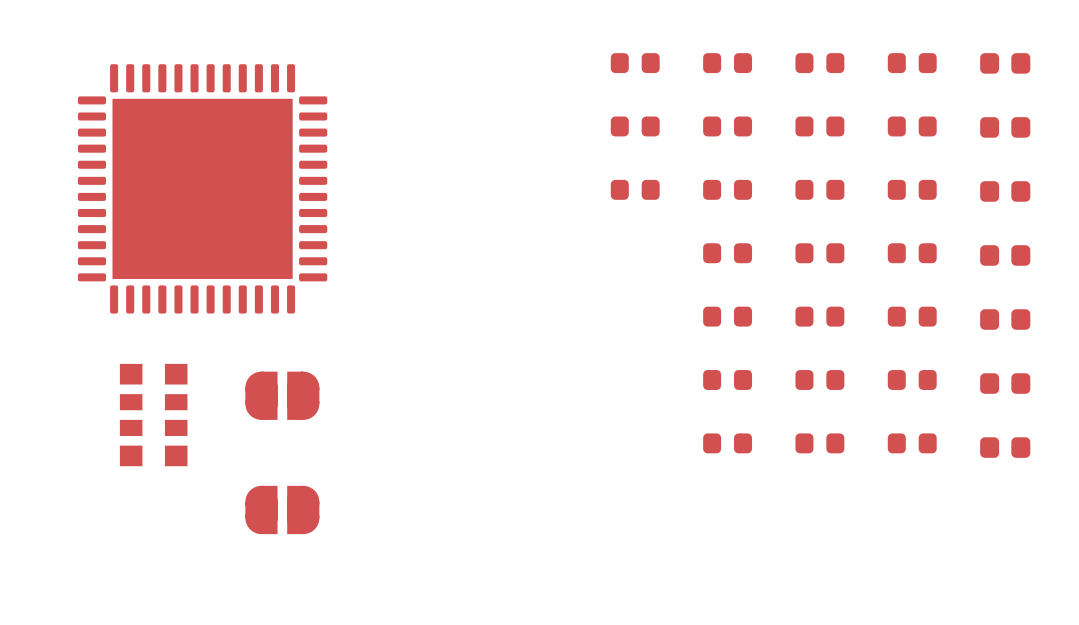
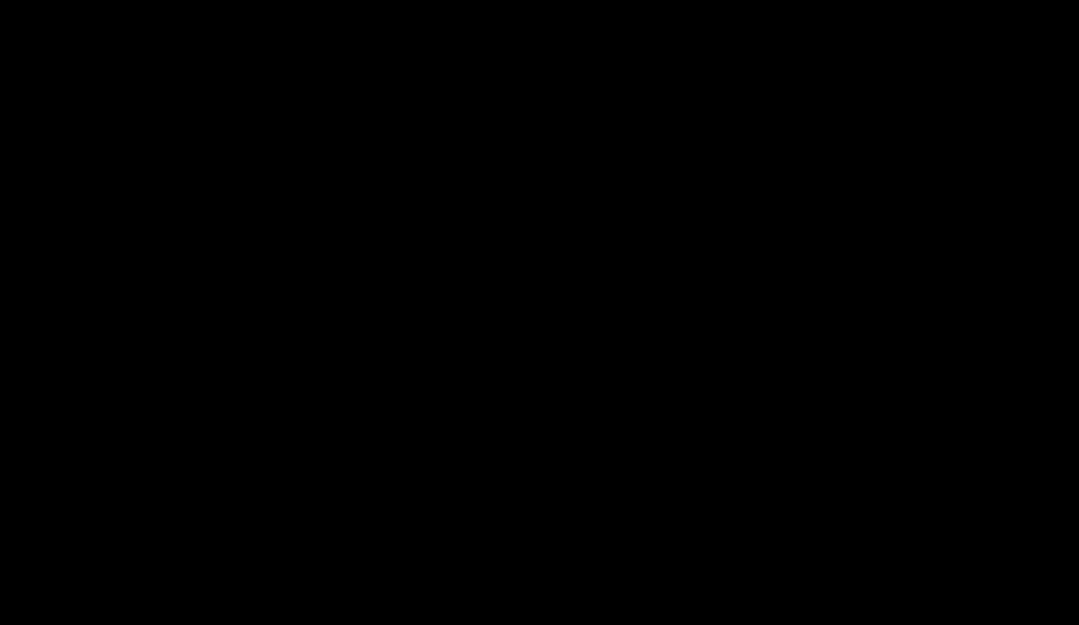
part: (635, 63) -> none
part: (727, 63) -> none
part: (819, 63) -> none
part: (912, 63) -> none
part: (1005, 63) -> none
part: (635, 126) -> none
part: (727, 126) -> none
part: (819, 126) -> none
part: (912, 126) -> none
part: (1005, 127) -> none
part: (202, 188) -> none
part: (635, 189) -> none
part: (727, 189) -> none
part: (819, 189) -> none
part: (912, 189) -> none
part: (1005, 191) -> none
part: (727, 253) -> none
part: (819, 253) -> none
part: (912, 253) -> none
part: (1005, 255) -> none
part: (727, 316) -> none
part: (819, 316) -> none
part: (912, 316) -> none
part: (1005, 319) -> none
part: (727, 380) -> none
part: (819, 380) -> none
part: (912, 380) -> none
part: (1005, 383) -> none
part: (282, 395) -> none
part: (153, 415) -> none
part: (727, 443) -> none
part: (819, 443) -> none
part: (912, 443) -> none
part: (1005, 447) -> none
part: (282, 509) -> none

